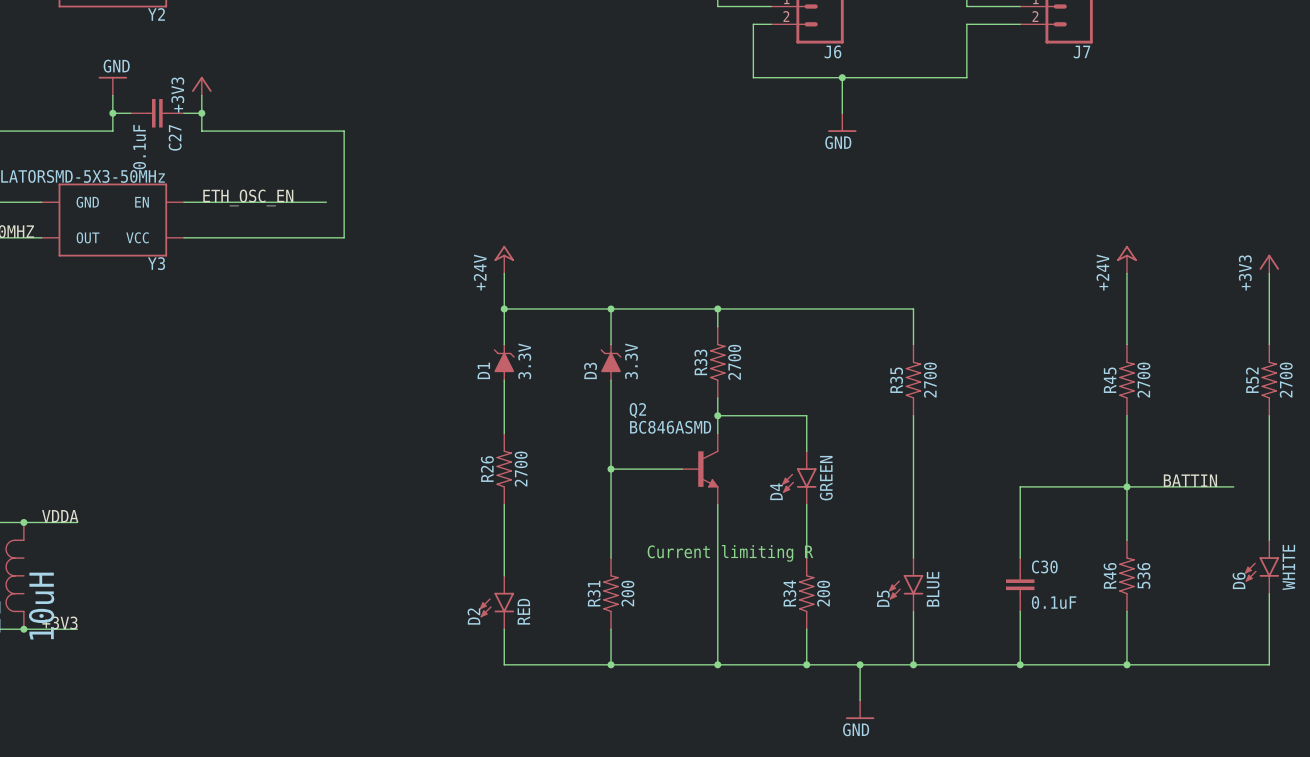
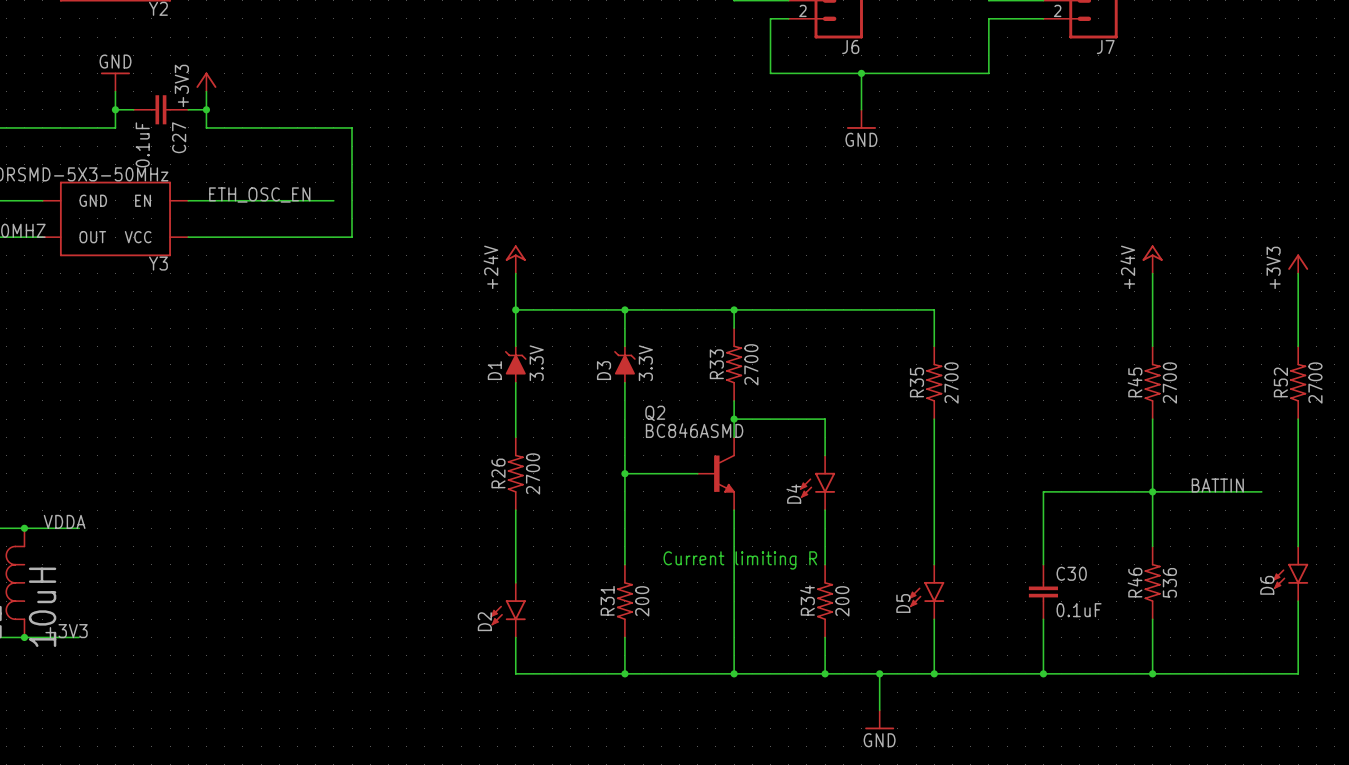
D4 value: GREEN (826, 478) -> none
D6 value: WHITE (1288, 567) -> none
D5 value: BLUE (933, 589) -> none
D2 value: RED (523, 611) -> none

